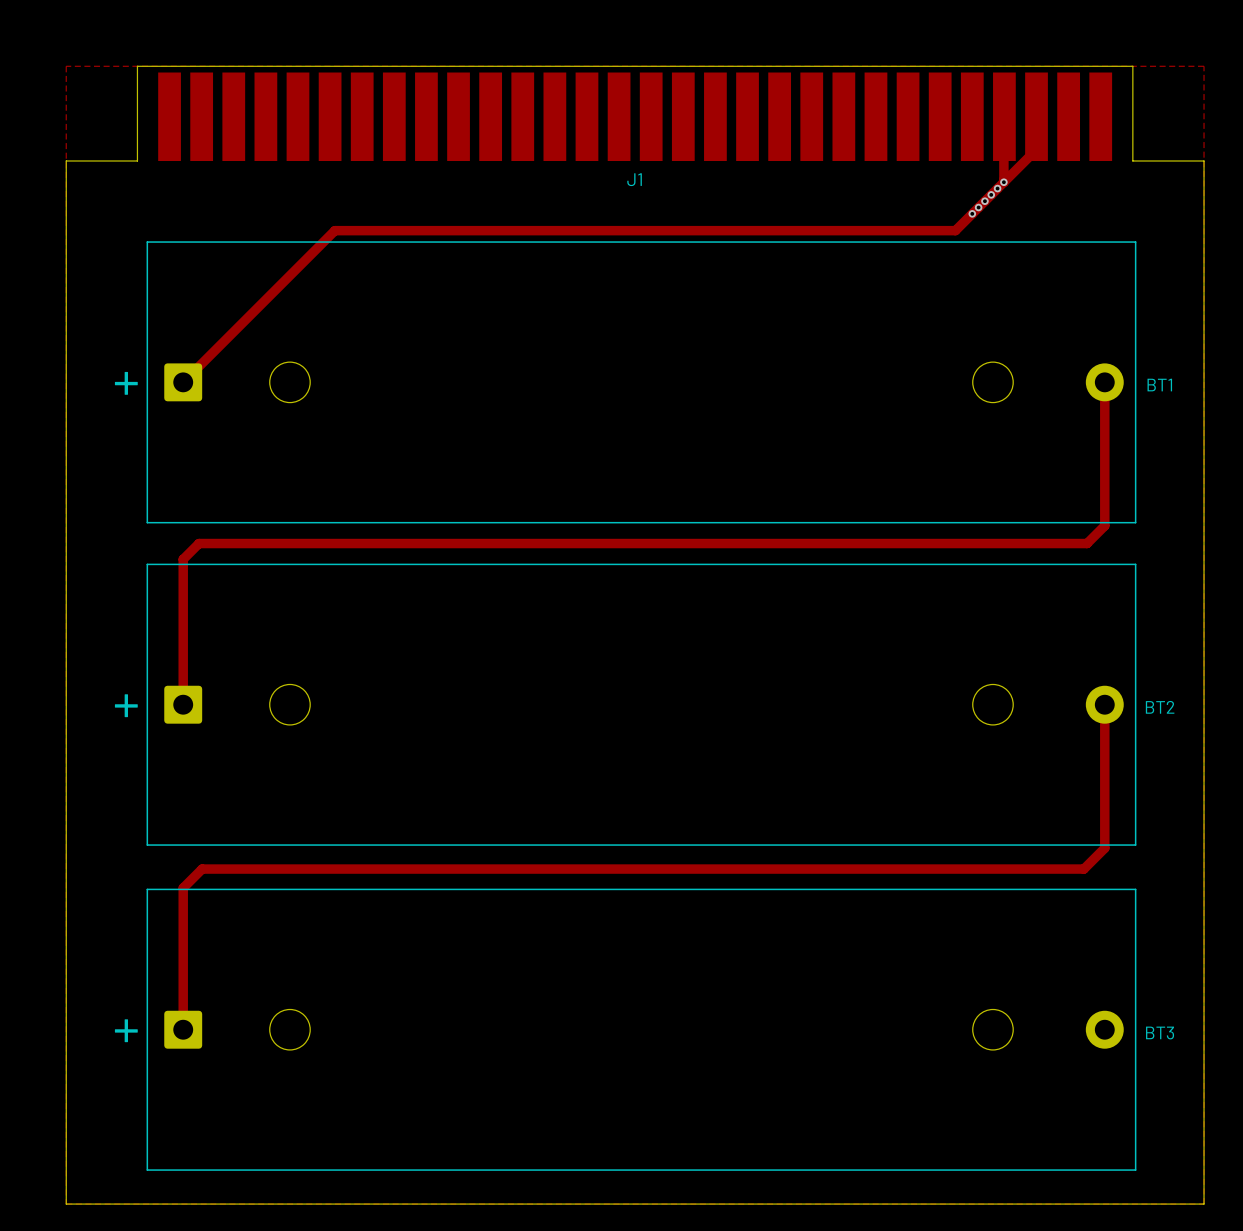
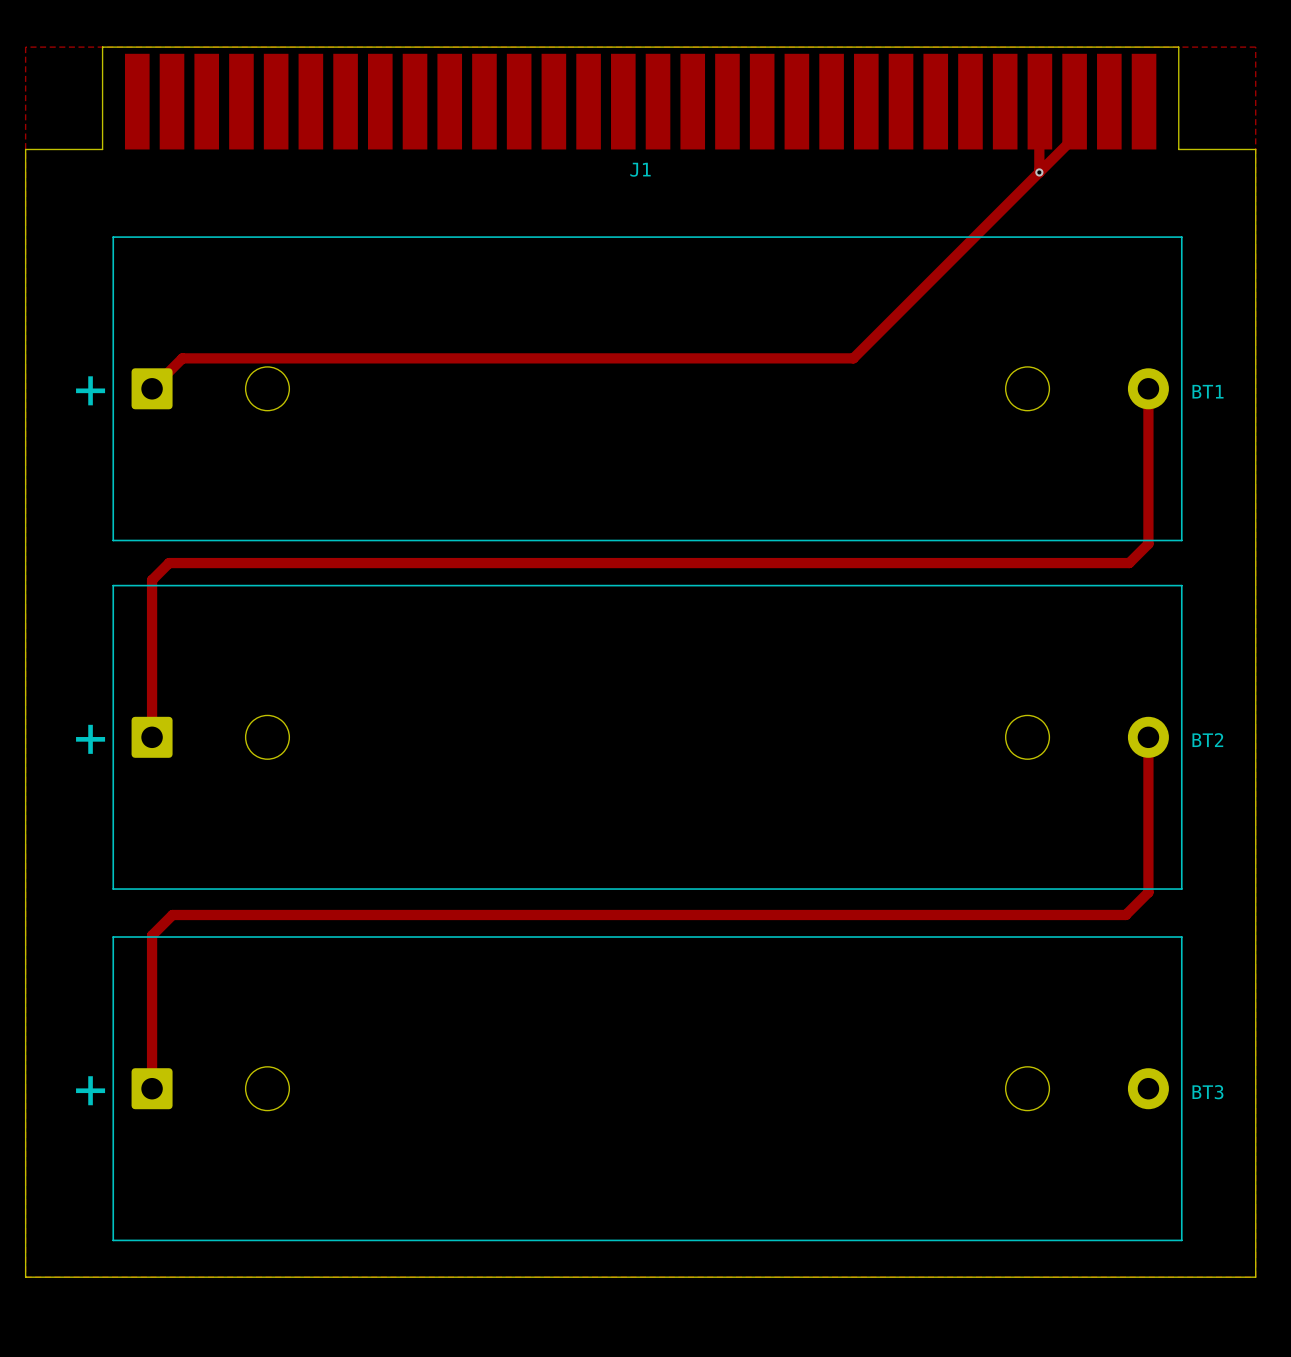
via: (997, 188) -> none
via: (991, 194) -> none
via: (984, 201) -> none
via: (978, 207) -> none
via: (972, 213) -> none
track: (955, 230) (334, 230) (211, 354) -> (987, 224) (853, 358) (182, 358)

